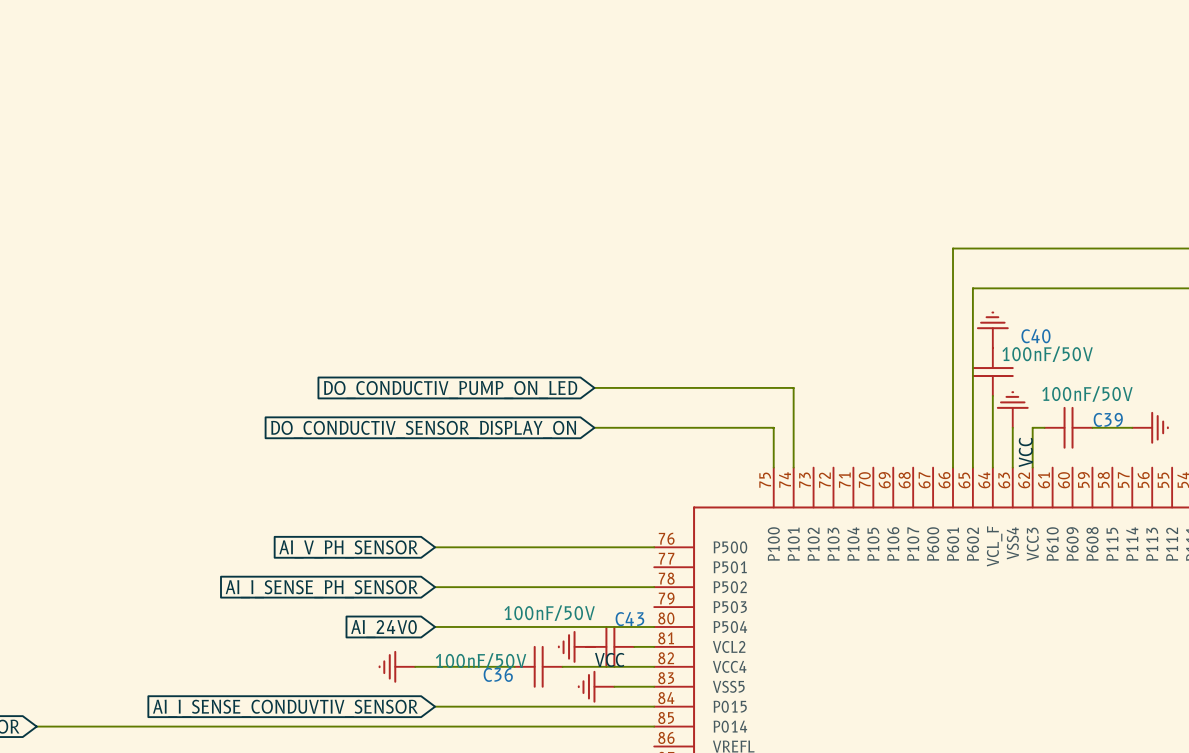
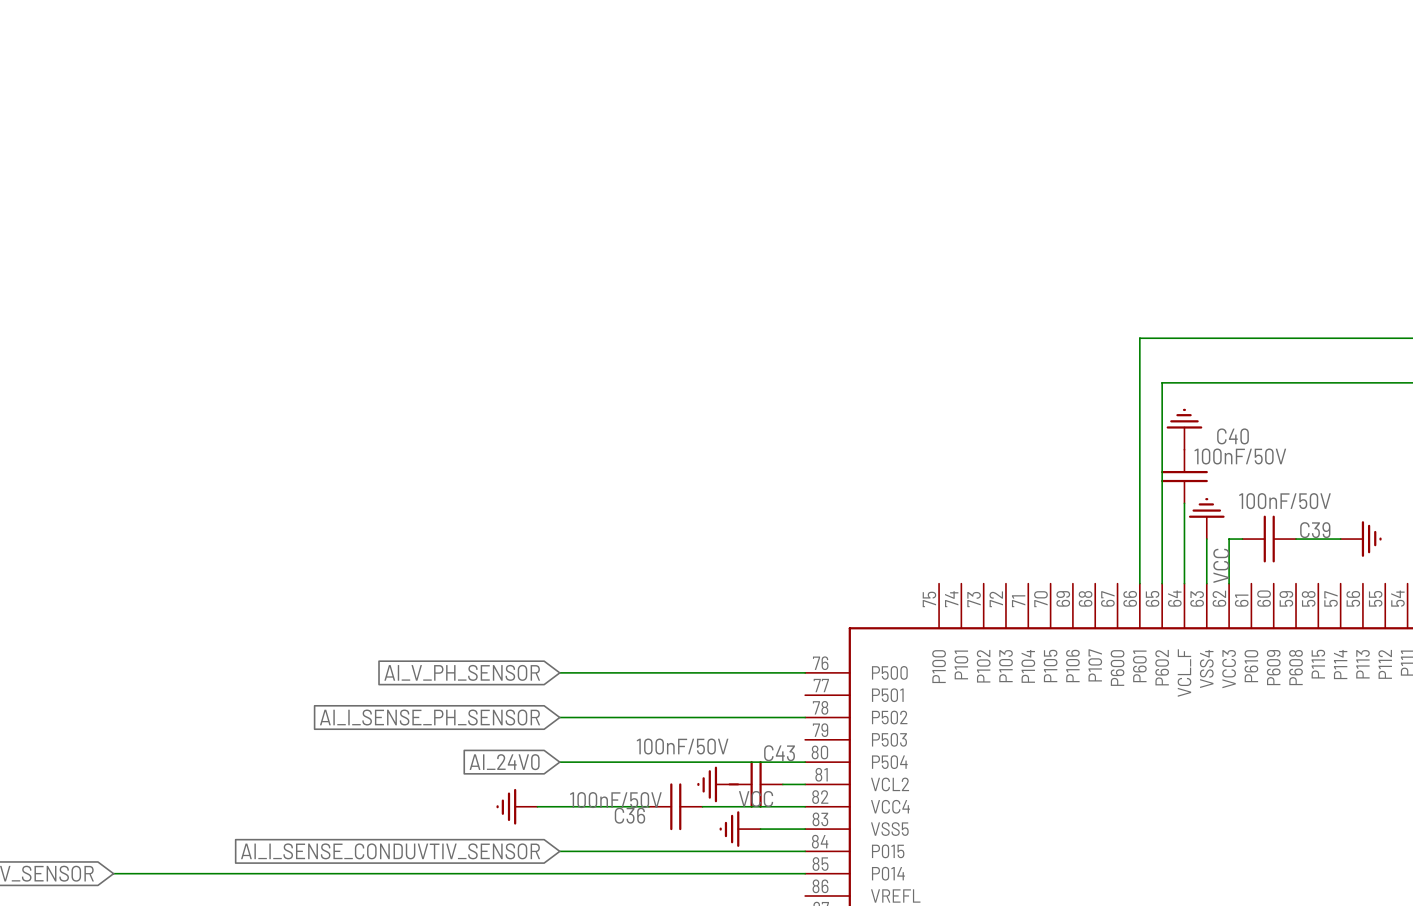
wire: (594, 387) (793, 387) (793, 467) -> none
global label: DO_CONDUCTIV_PUMP_ON_LED (450, 390) -> none
wire: (594, 427) (773, 427) (773, 467) -> none
global label: DO_CONDUCTIV_SENSOR_DISPLAY_ON (423, 429) -> none

